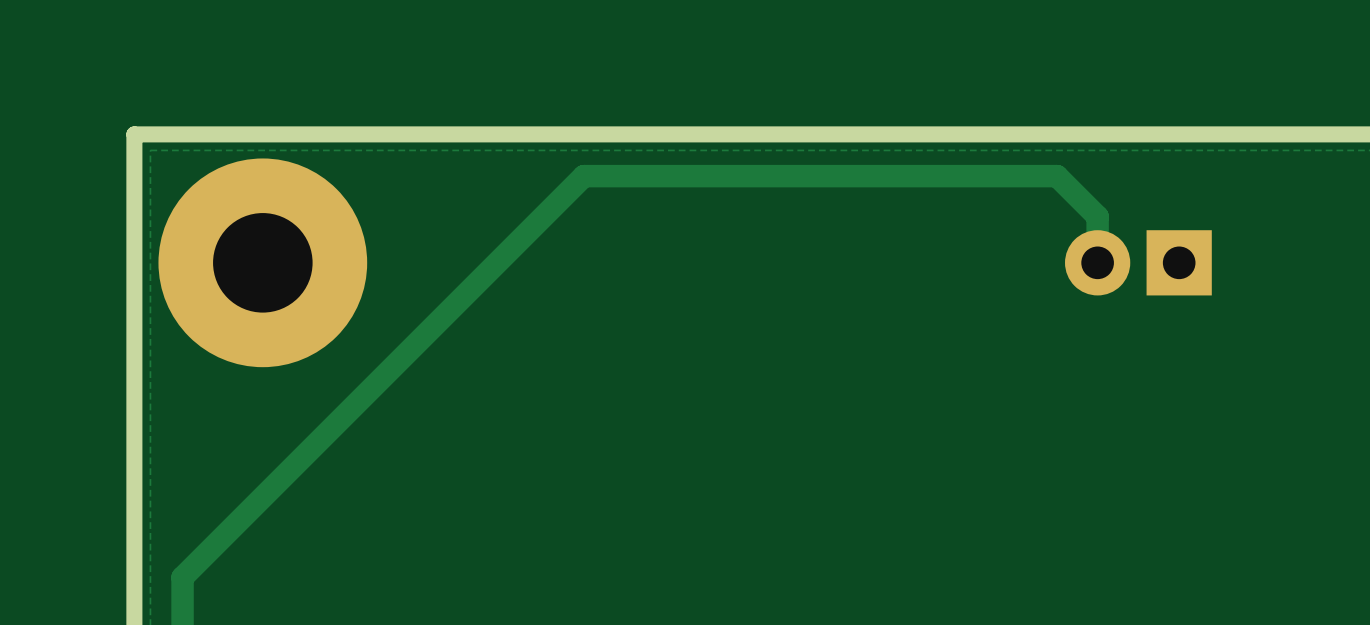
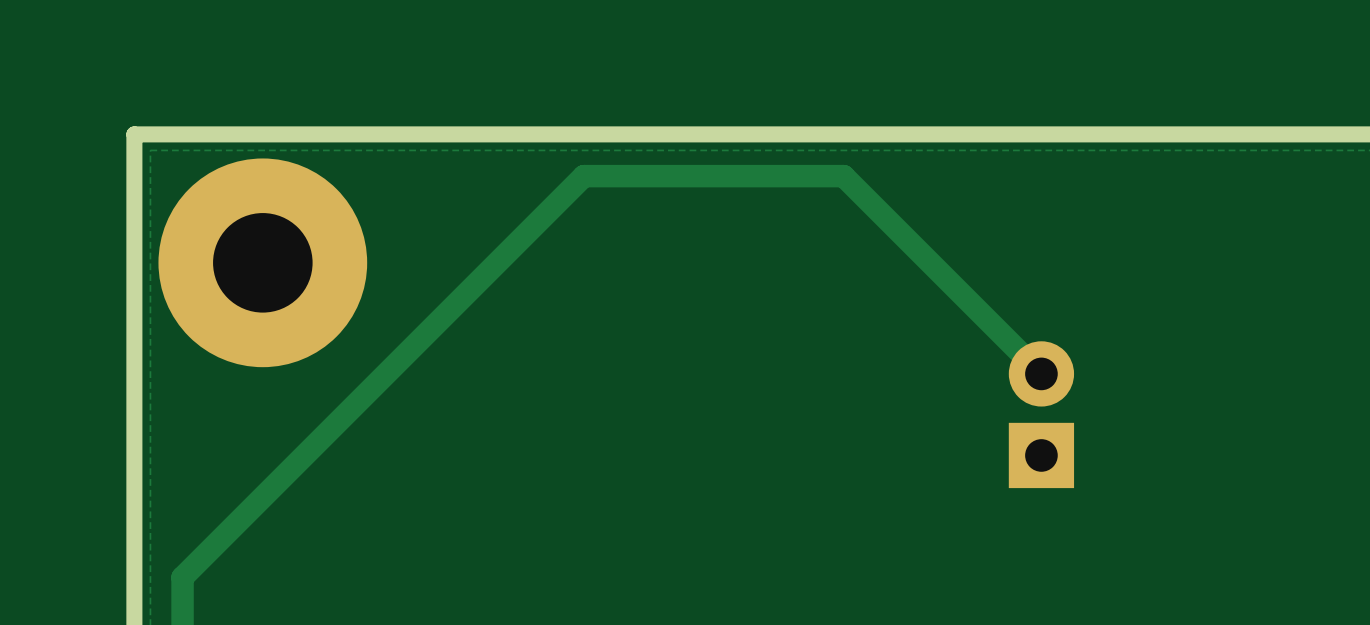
track: (843, 176) (1057, 176) (1097, 216) (1097, 262) -> (843, 176) (1041, 373)
part rotation: 0° (1138, 262) -> 90° clockwise (1041, 414)
part position: (1138, 262) -> (1041, 414)

